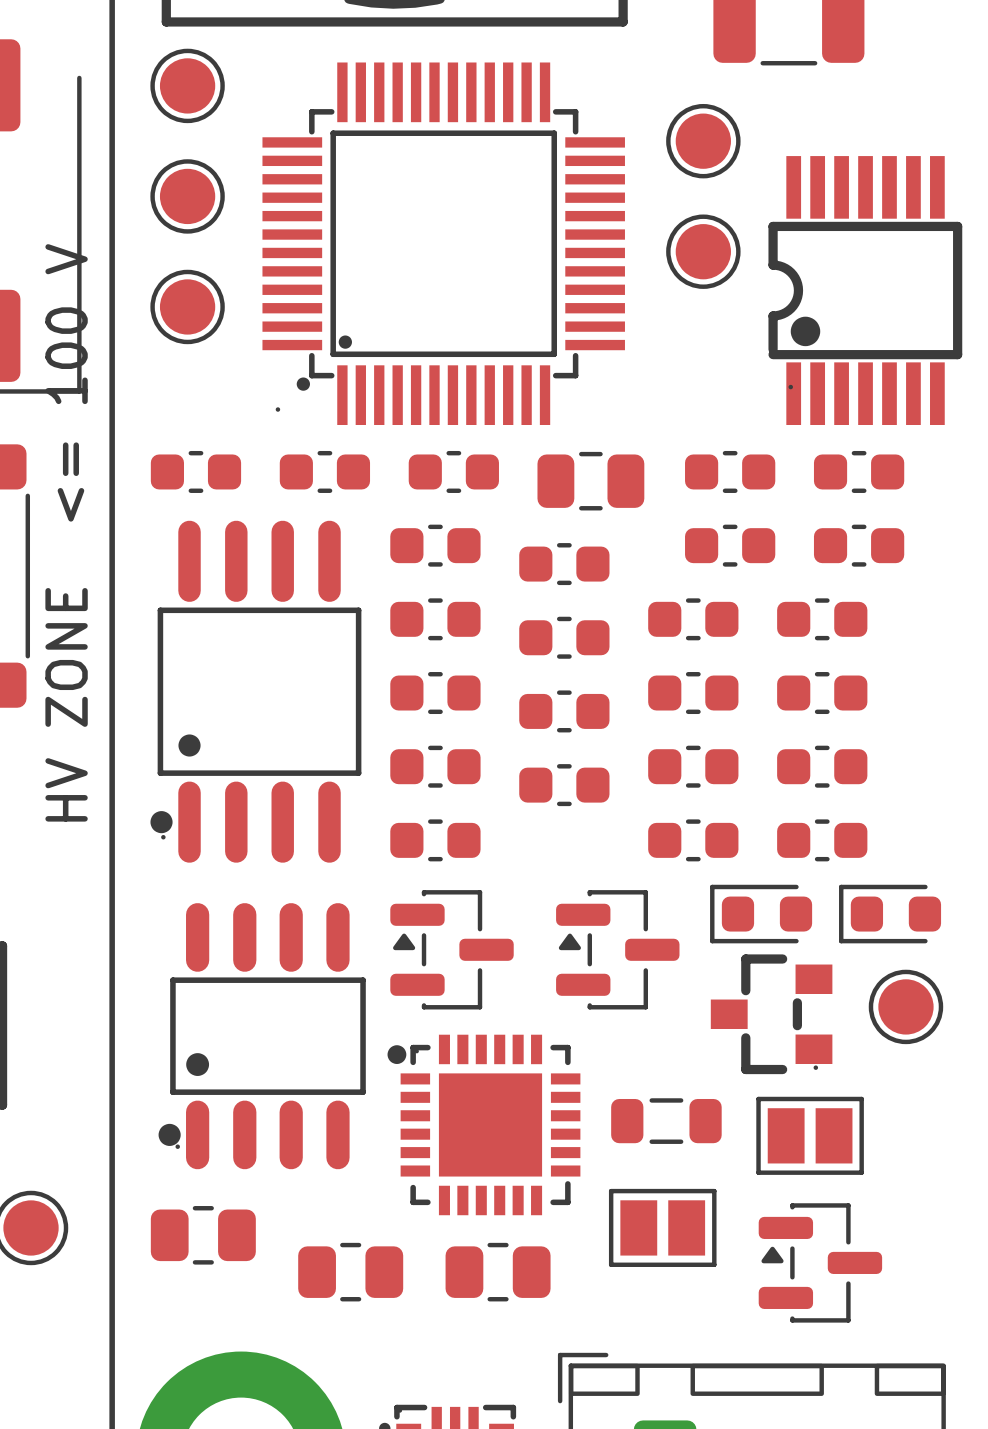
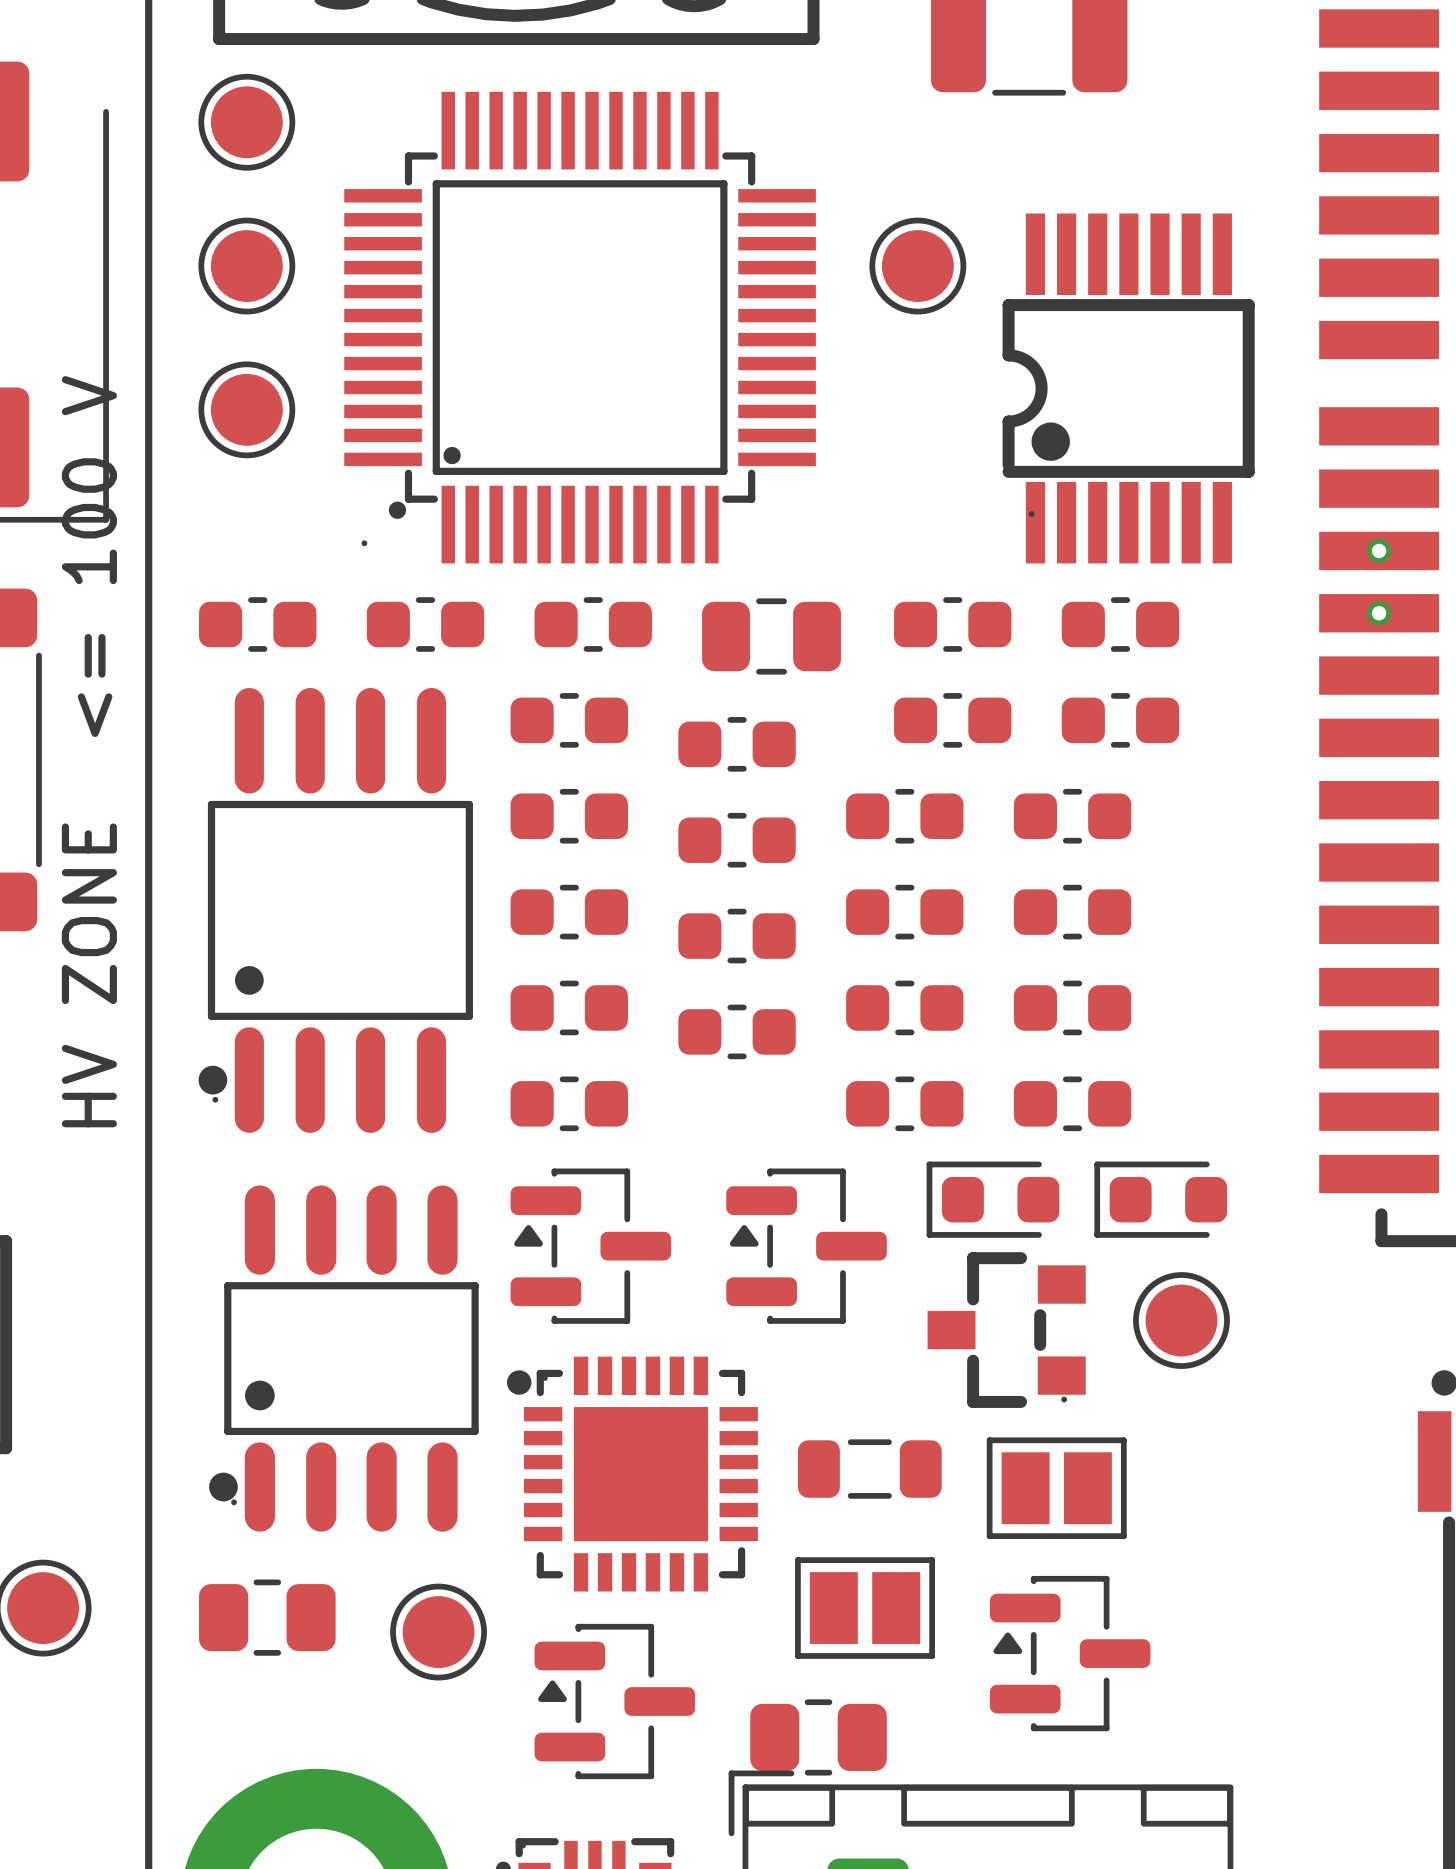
part: (703, 141) -> none
part: none -> (917, 266)
part: (703, 251) -> none
text position: HV ZONE <= 100 V (66, 532) -> HV ZONE <= 100 V (89, 751)
part footprint: [298, 1242, 404, 1302] -> [390, 1583, 487, 1681]
part position: (498, 1272) -> (818, 1737)
part: none -> (614, 1701)

